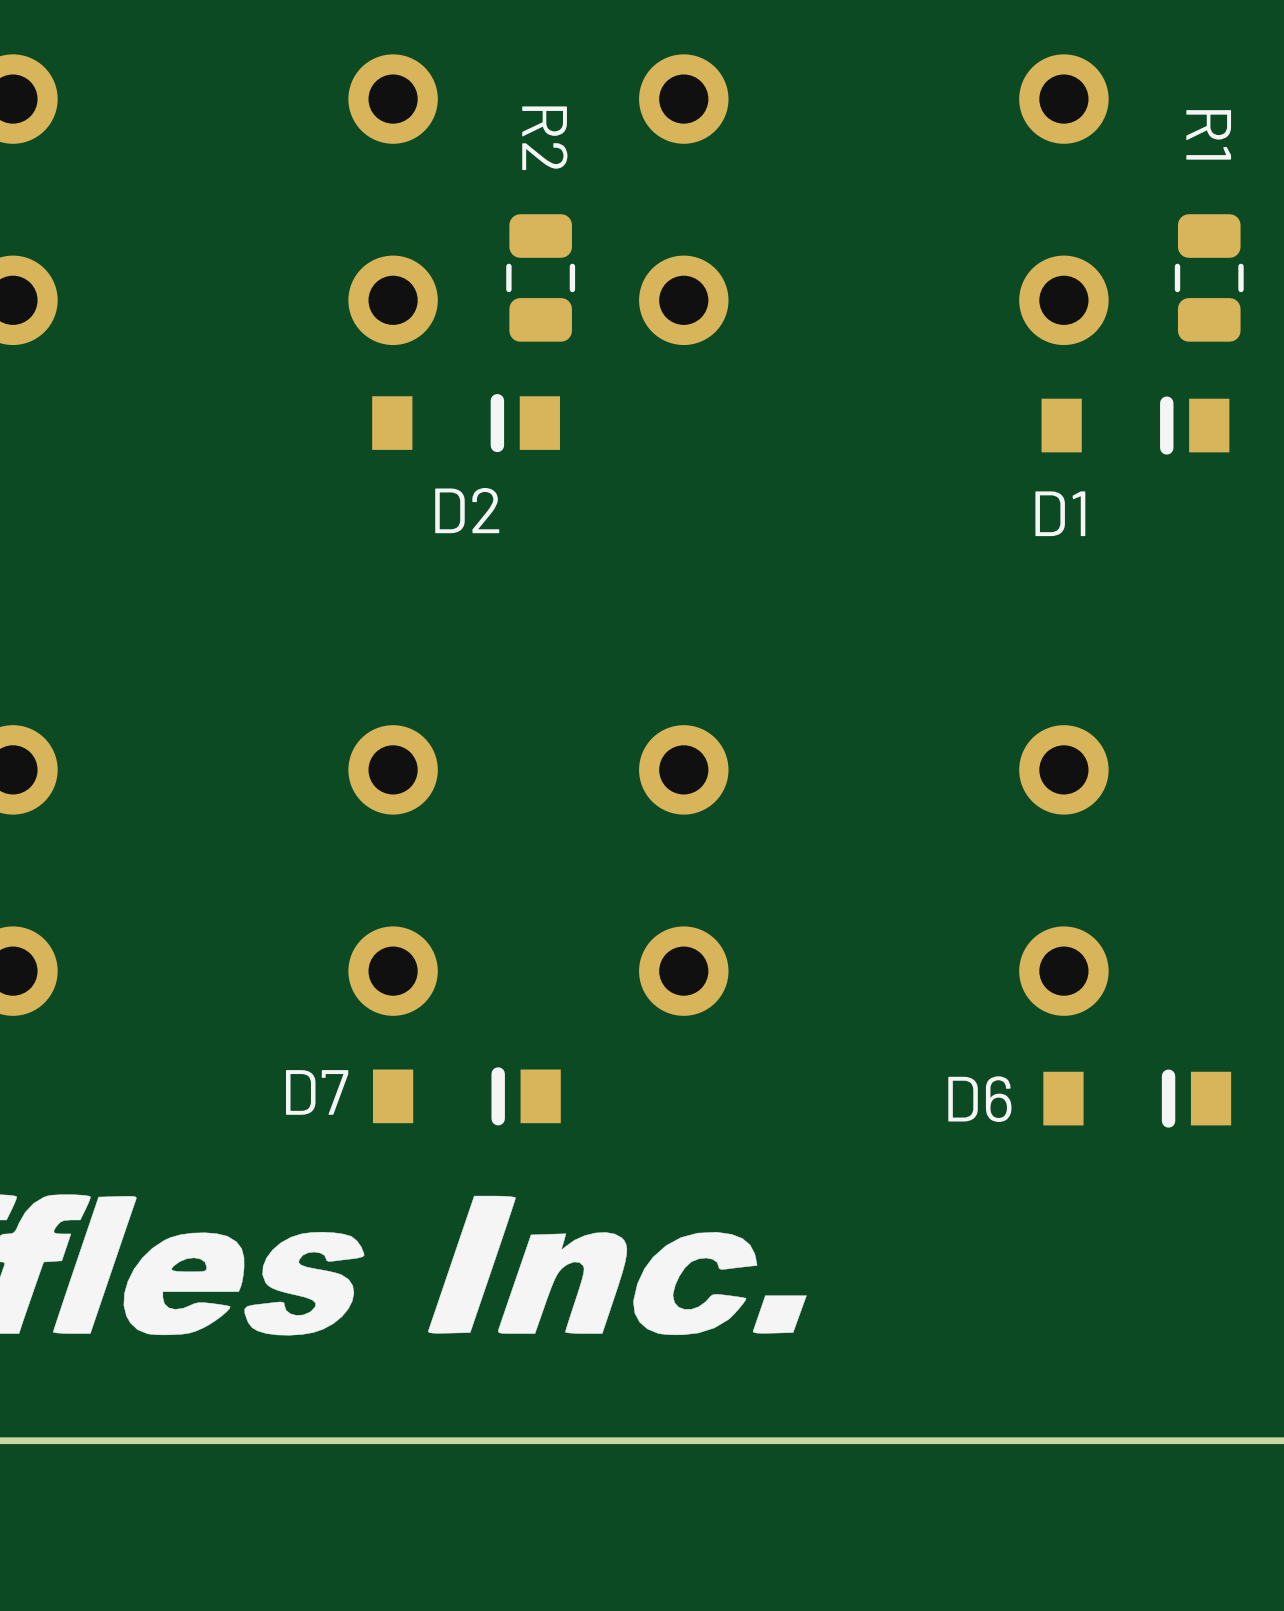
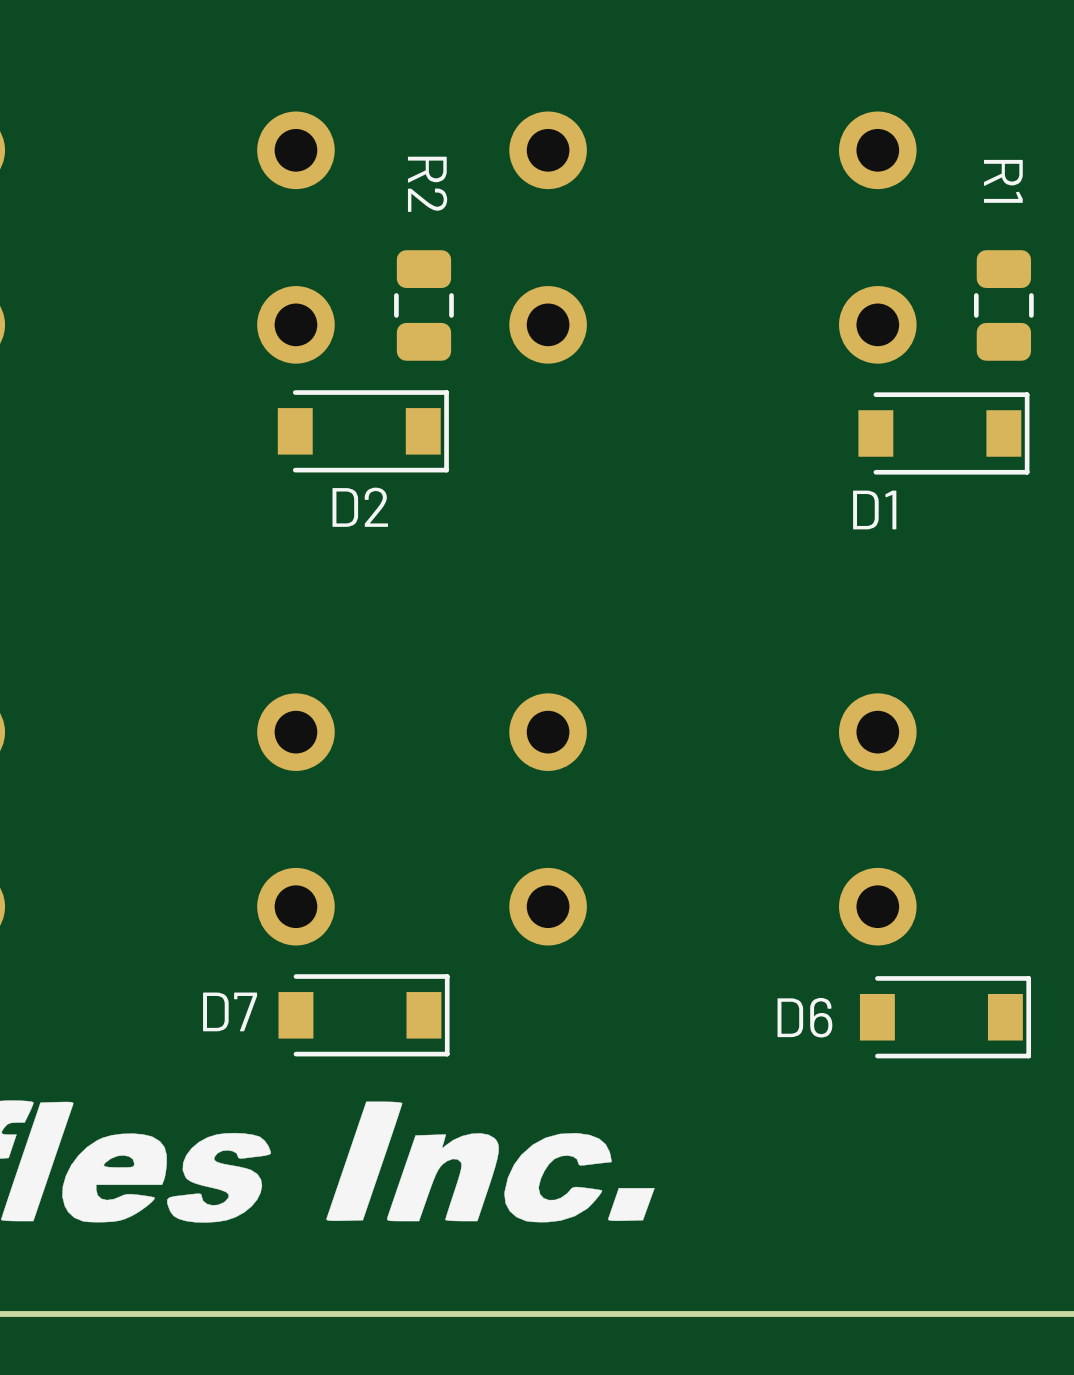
D2 footprint: [372, 394, 560, 453] -> [277, 390, 449, 473]
D1 footprint: [1041, 396, 1230, 455] -> [858, 392, 1030, 475]
D7 footprint: [372, 1067, 561, 1126] -> [278, 974, 450, 1057]
D6 footprint: [1043, 1069, 1232, 1128] -> [859, 976, 1032, 1059]

